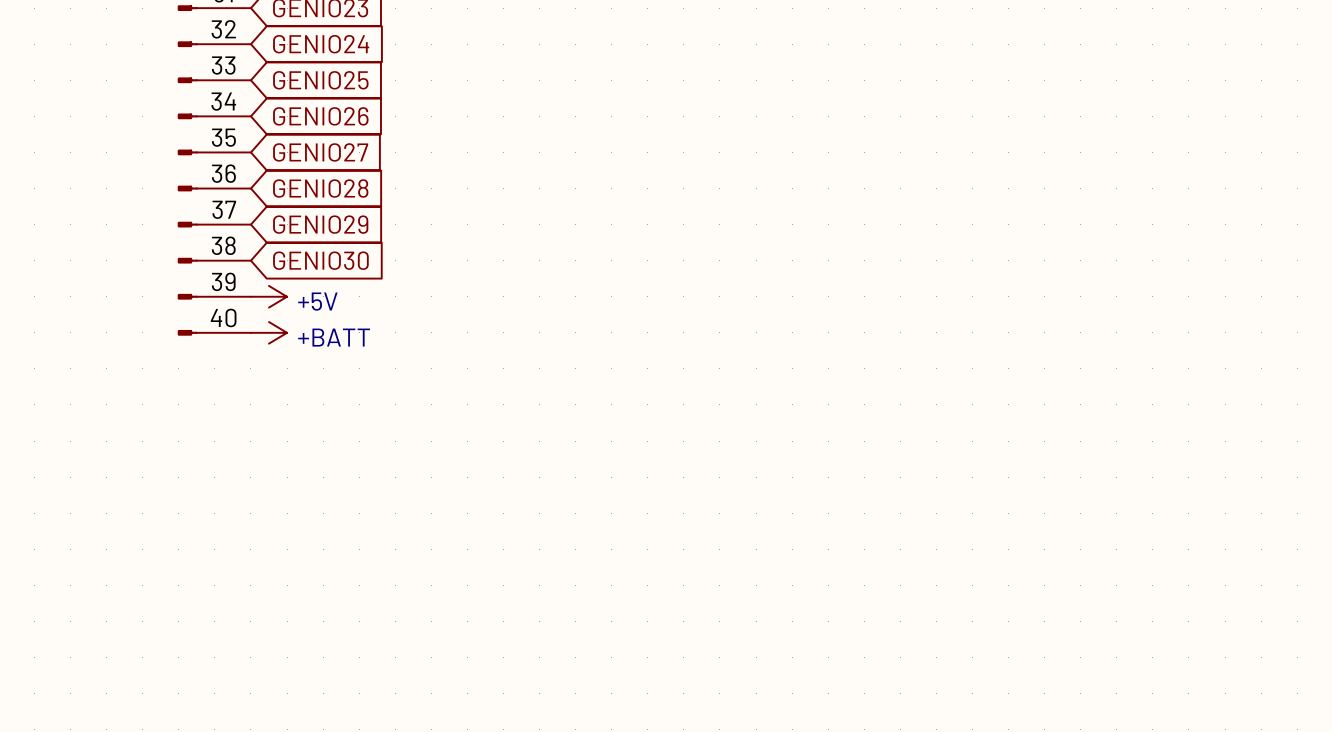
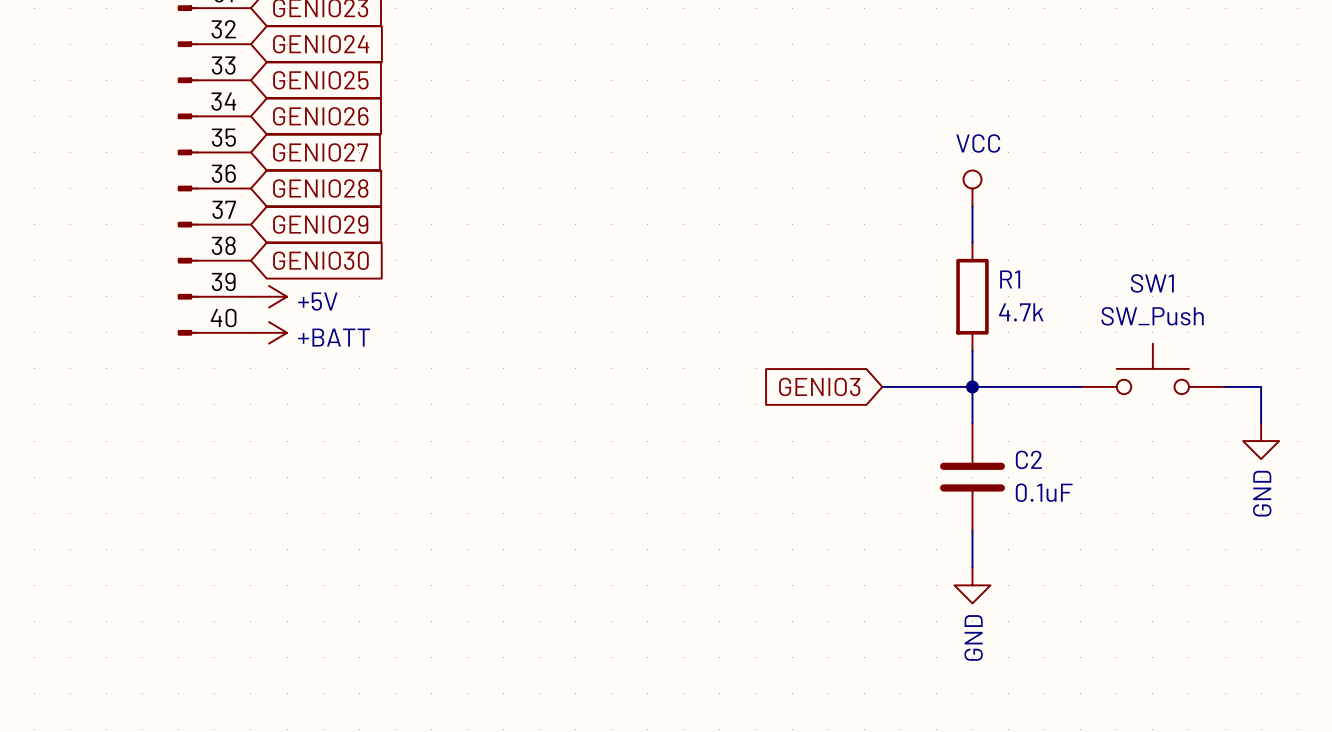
power symbol: none -> VCC (972, 188)
wire: none -> (972, 206) (972, 242)
R1: none -> 4.7k (972, 296)
wire: none -> (972, 350) (972, 423)
SW1: none -> SW_Push (1152, 368)
global label: none -> GENIO3 (819, 386)
wire: none -> (882, 386) (1080, 386)
junction: none -> (972, 386)
wire: none -> (1225, 386) (1261, 386) (1261, 423)
power symbol: none -> GND (1261, 441)
C2: none -> 0.1uF (972, 477)
wire: none -> (972, 531) (972, 567)
power symbol: none -> GND (972, 585)

